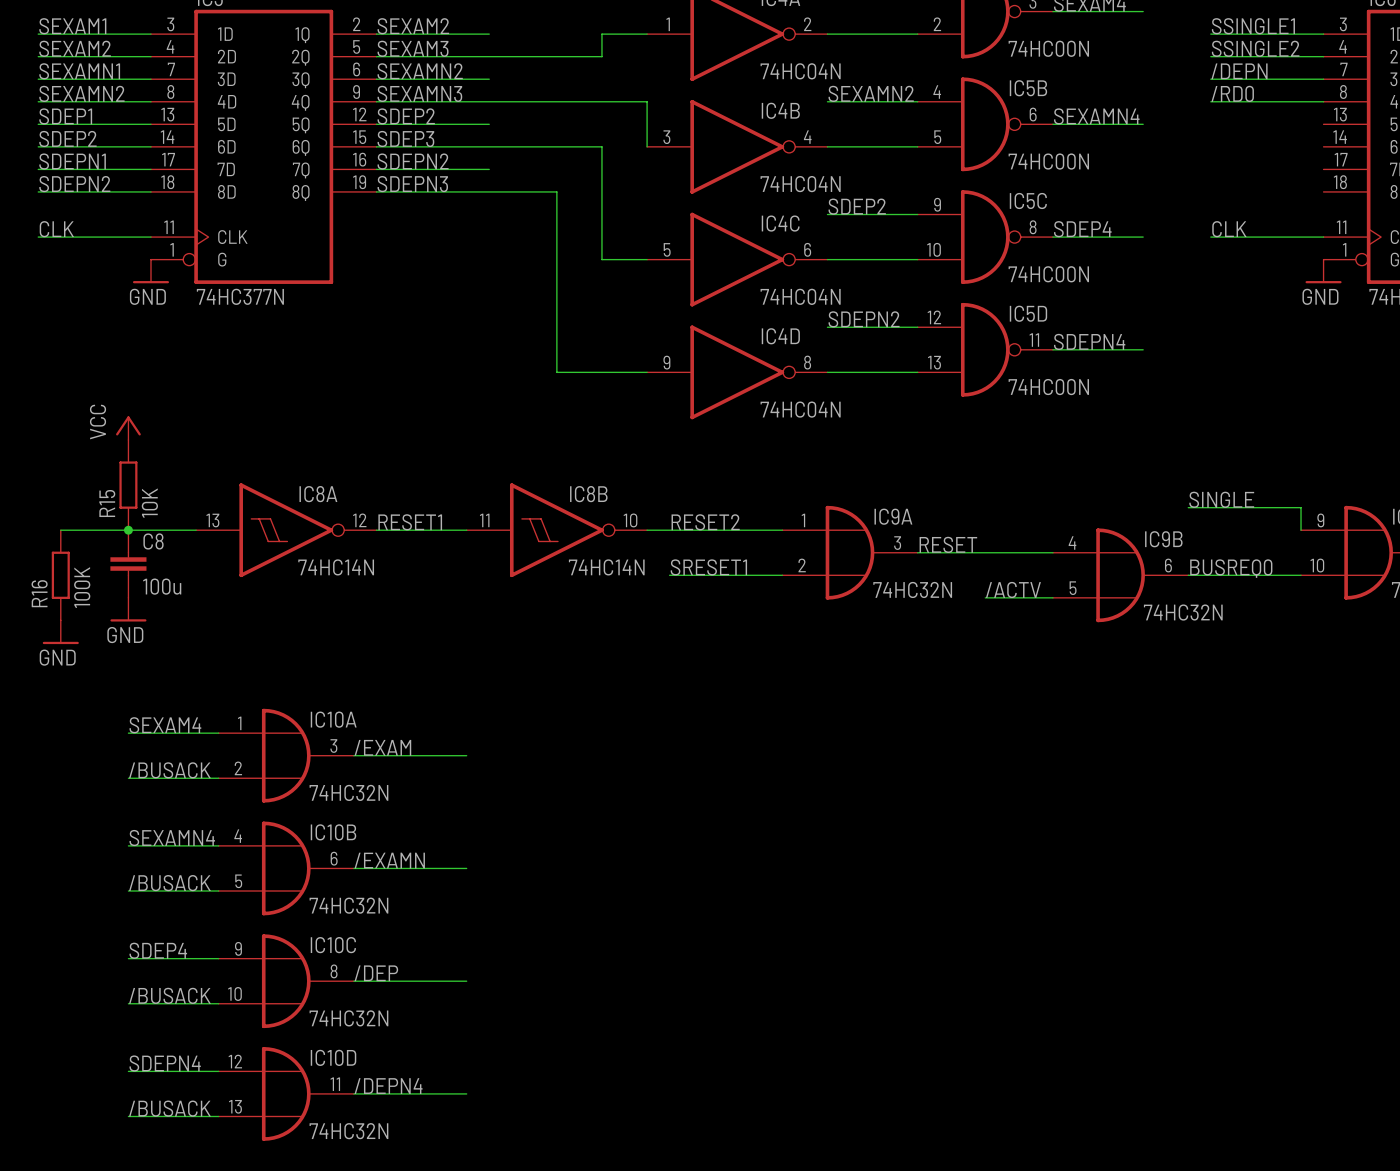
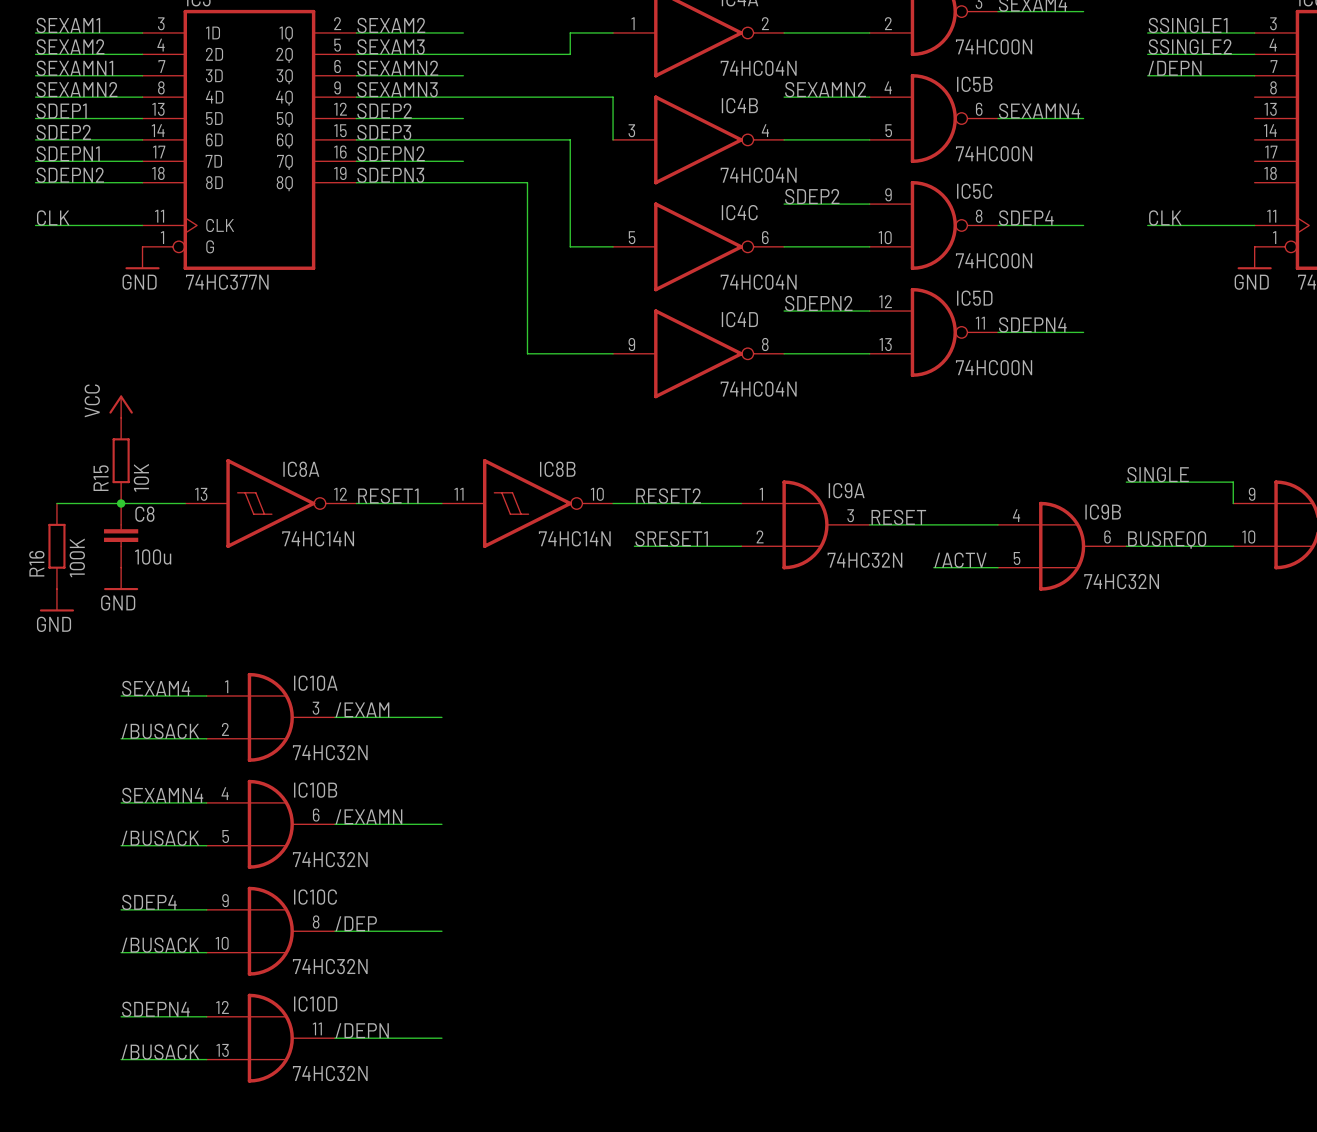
label: /RD0 (1232, 93) -> none
wire: (1210, 101) (1323, 101) -> none
label: /DEPN4 (388, 1086) -> /DEPN (362, 1030)

